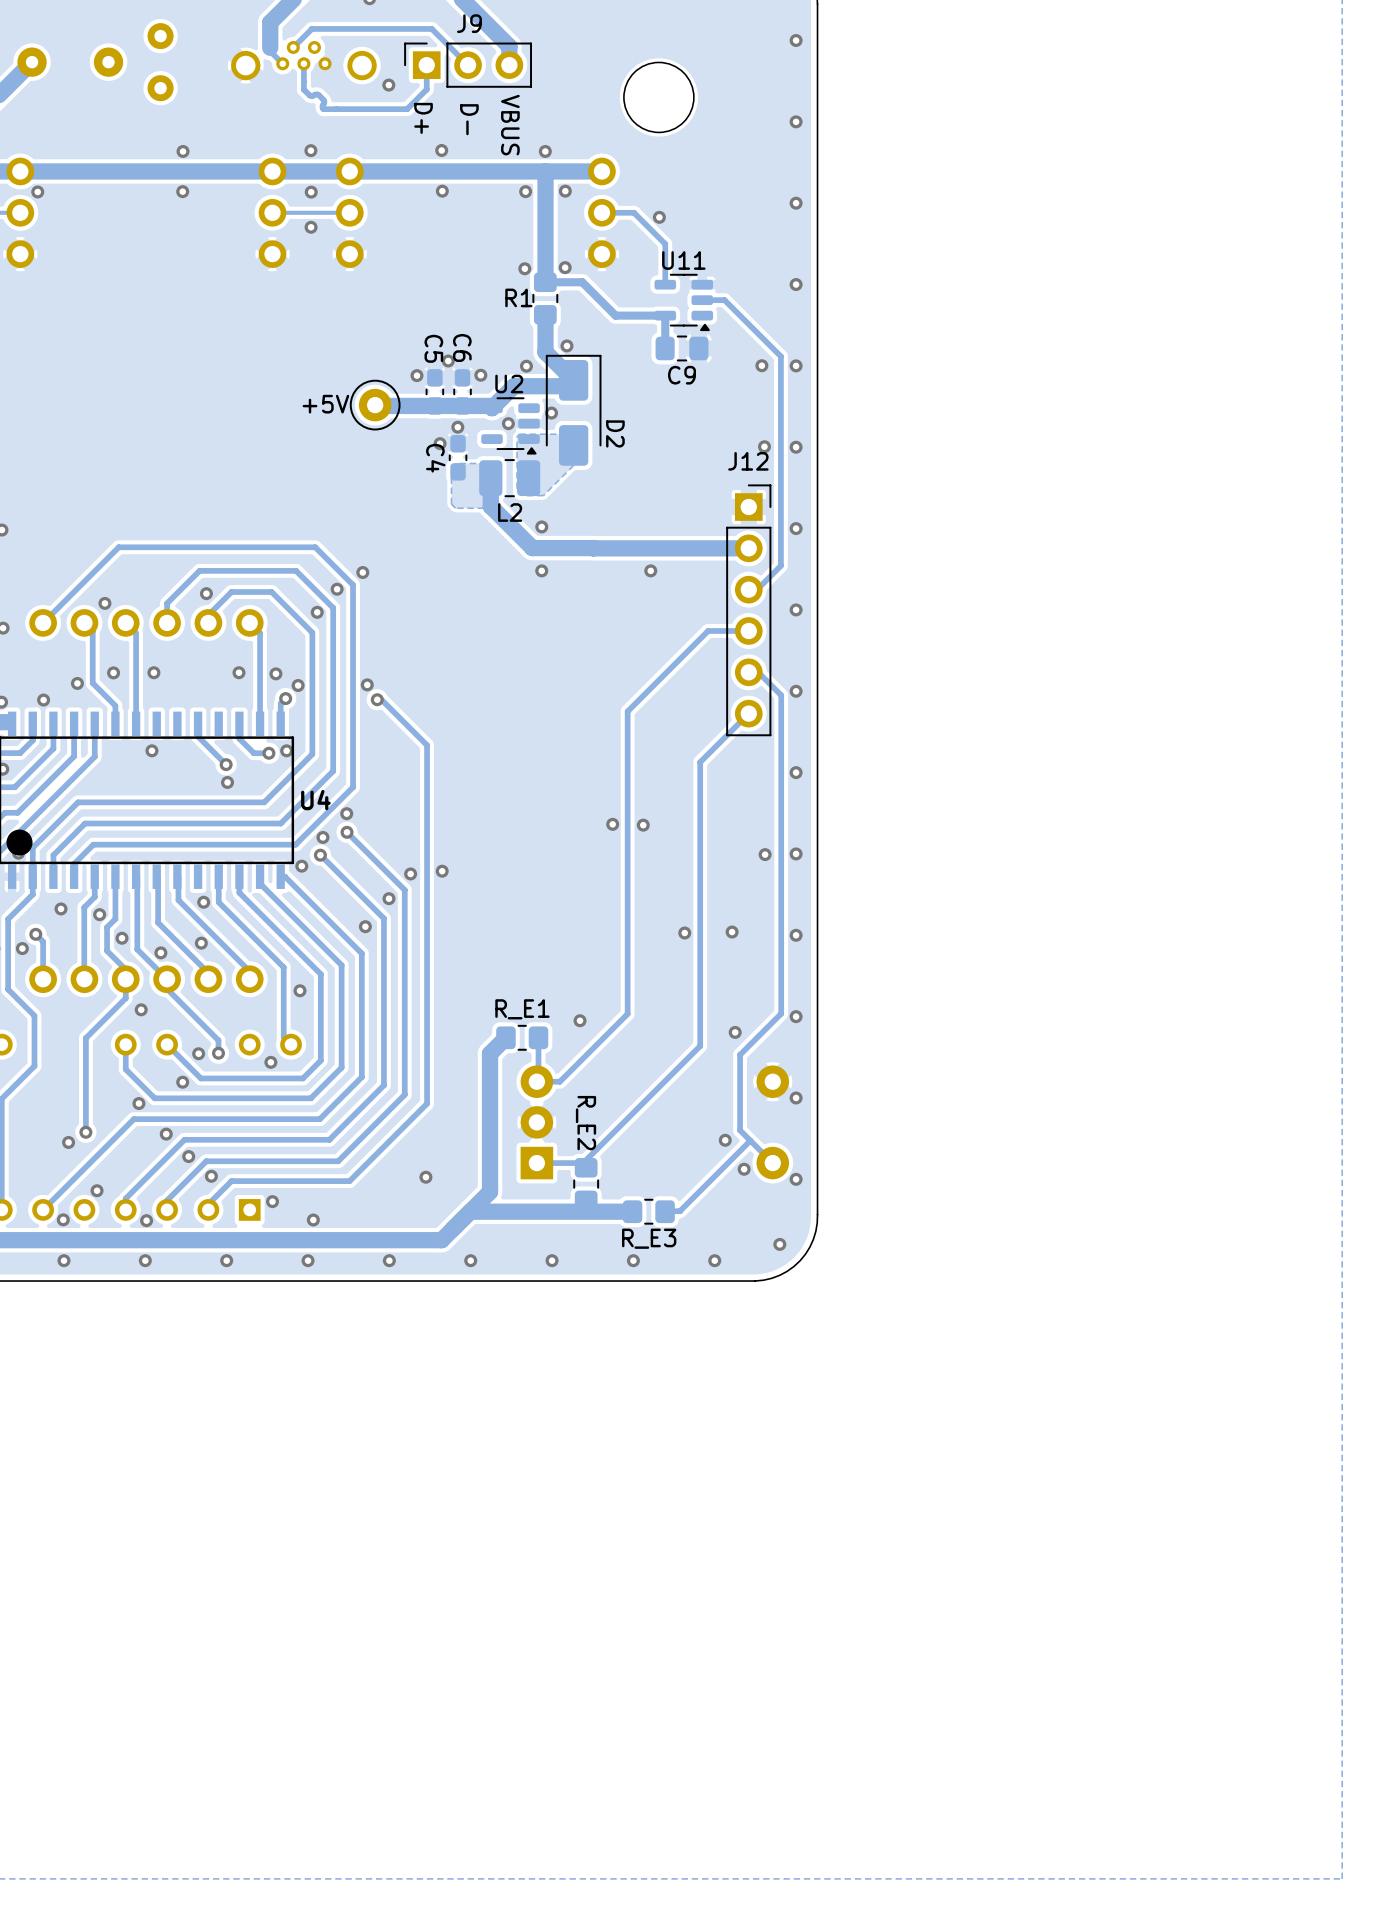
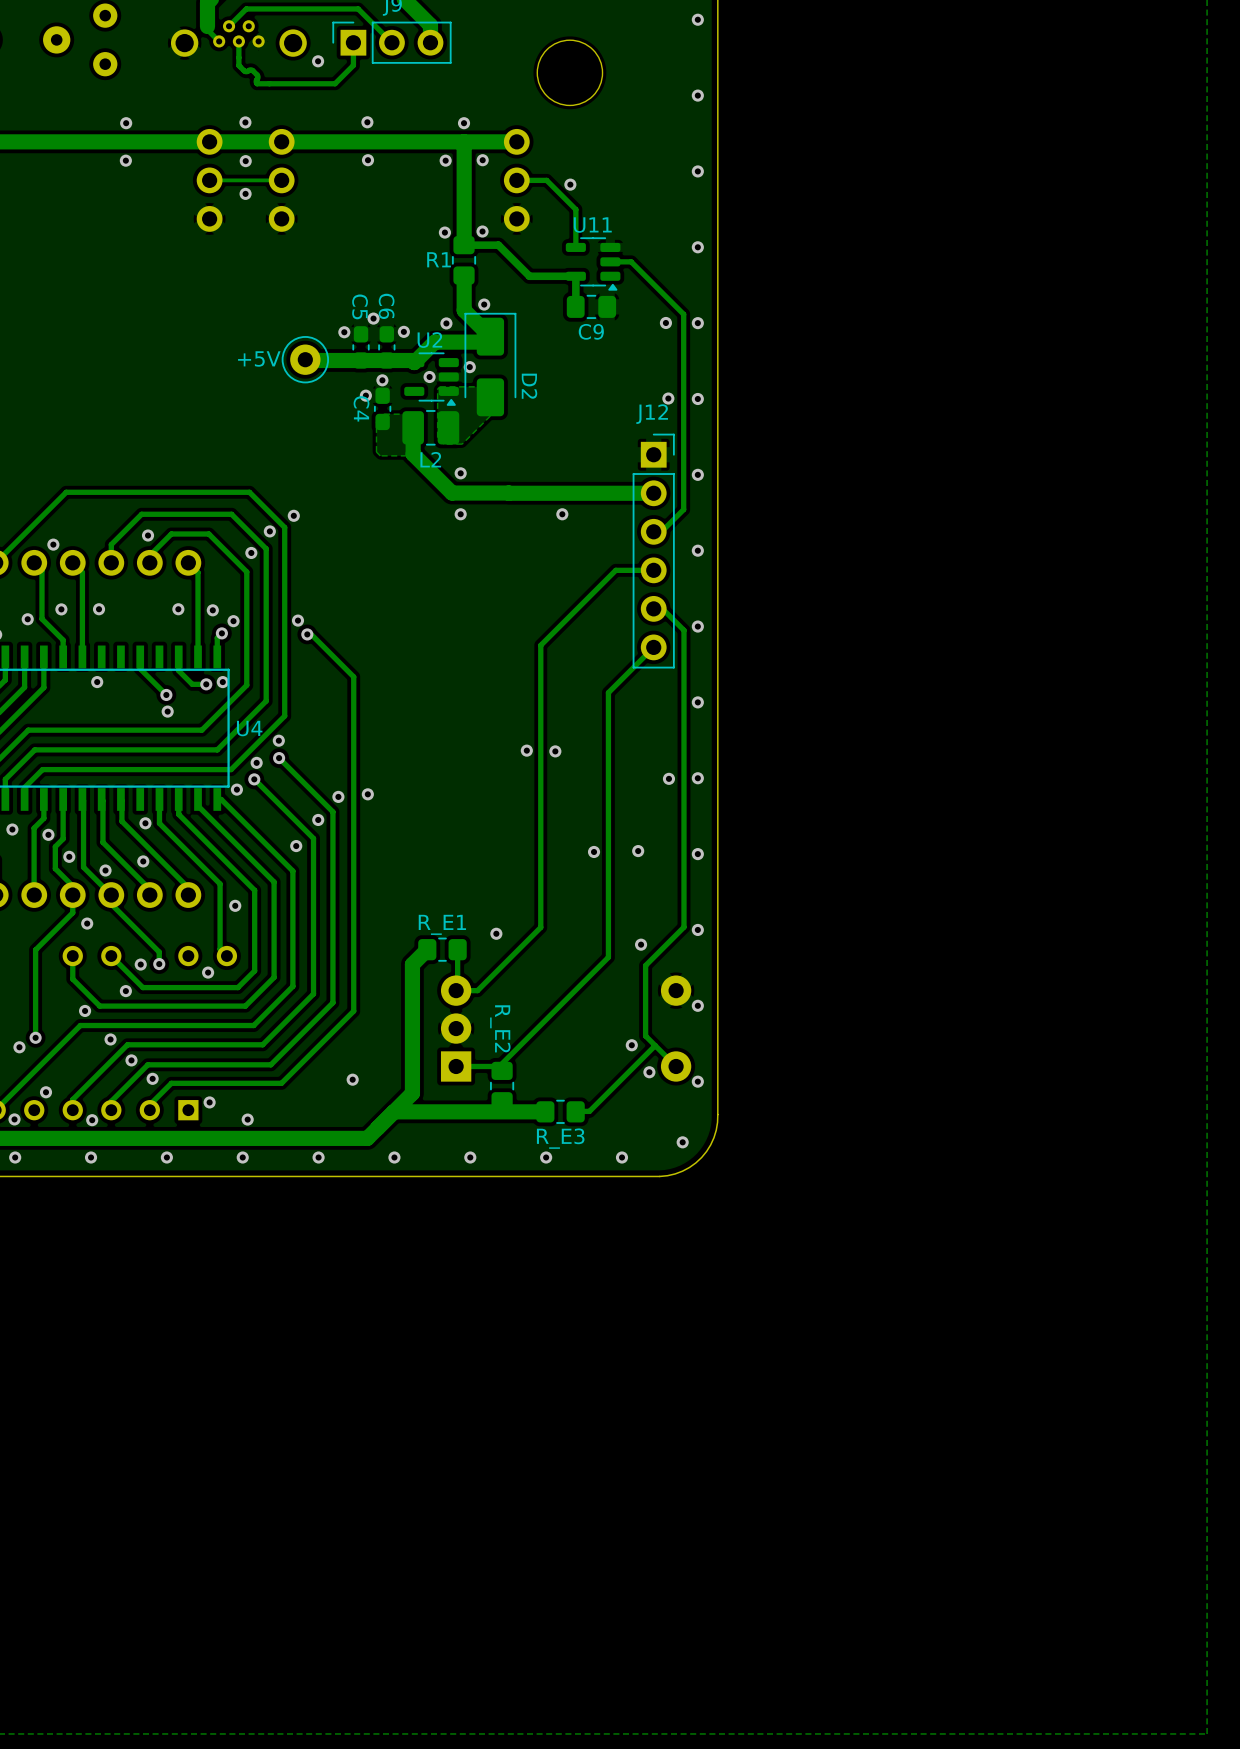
text: D+ (423, 118) -> none
text: D- (469, 119) -> none
text: VBUS (510, 125) -> none

